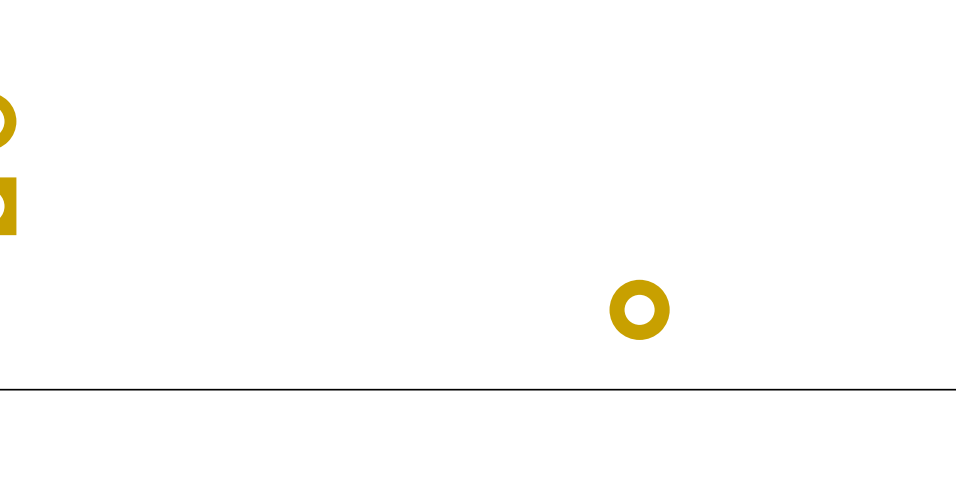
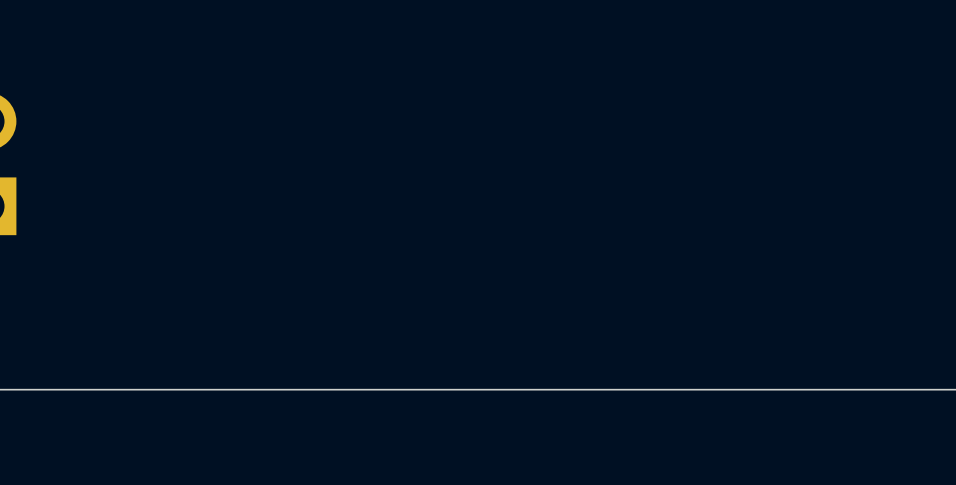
part: (639, 309) -> none

